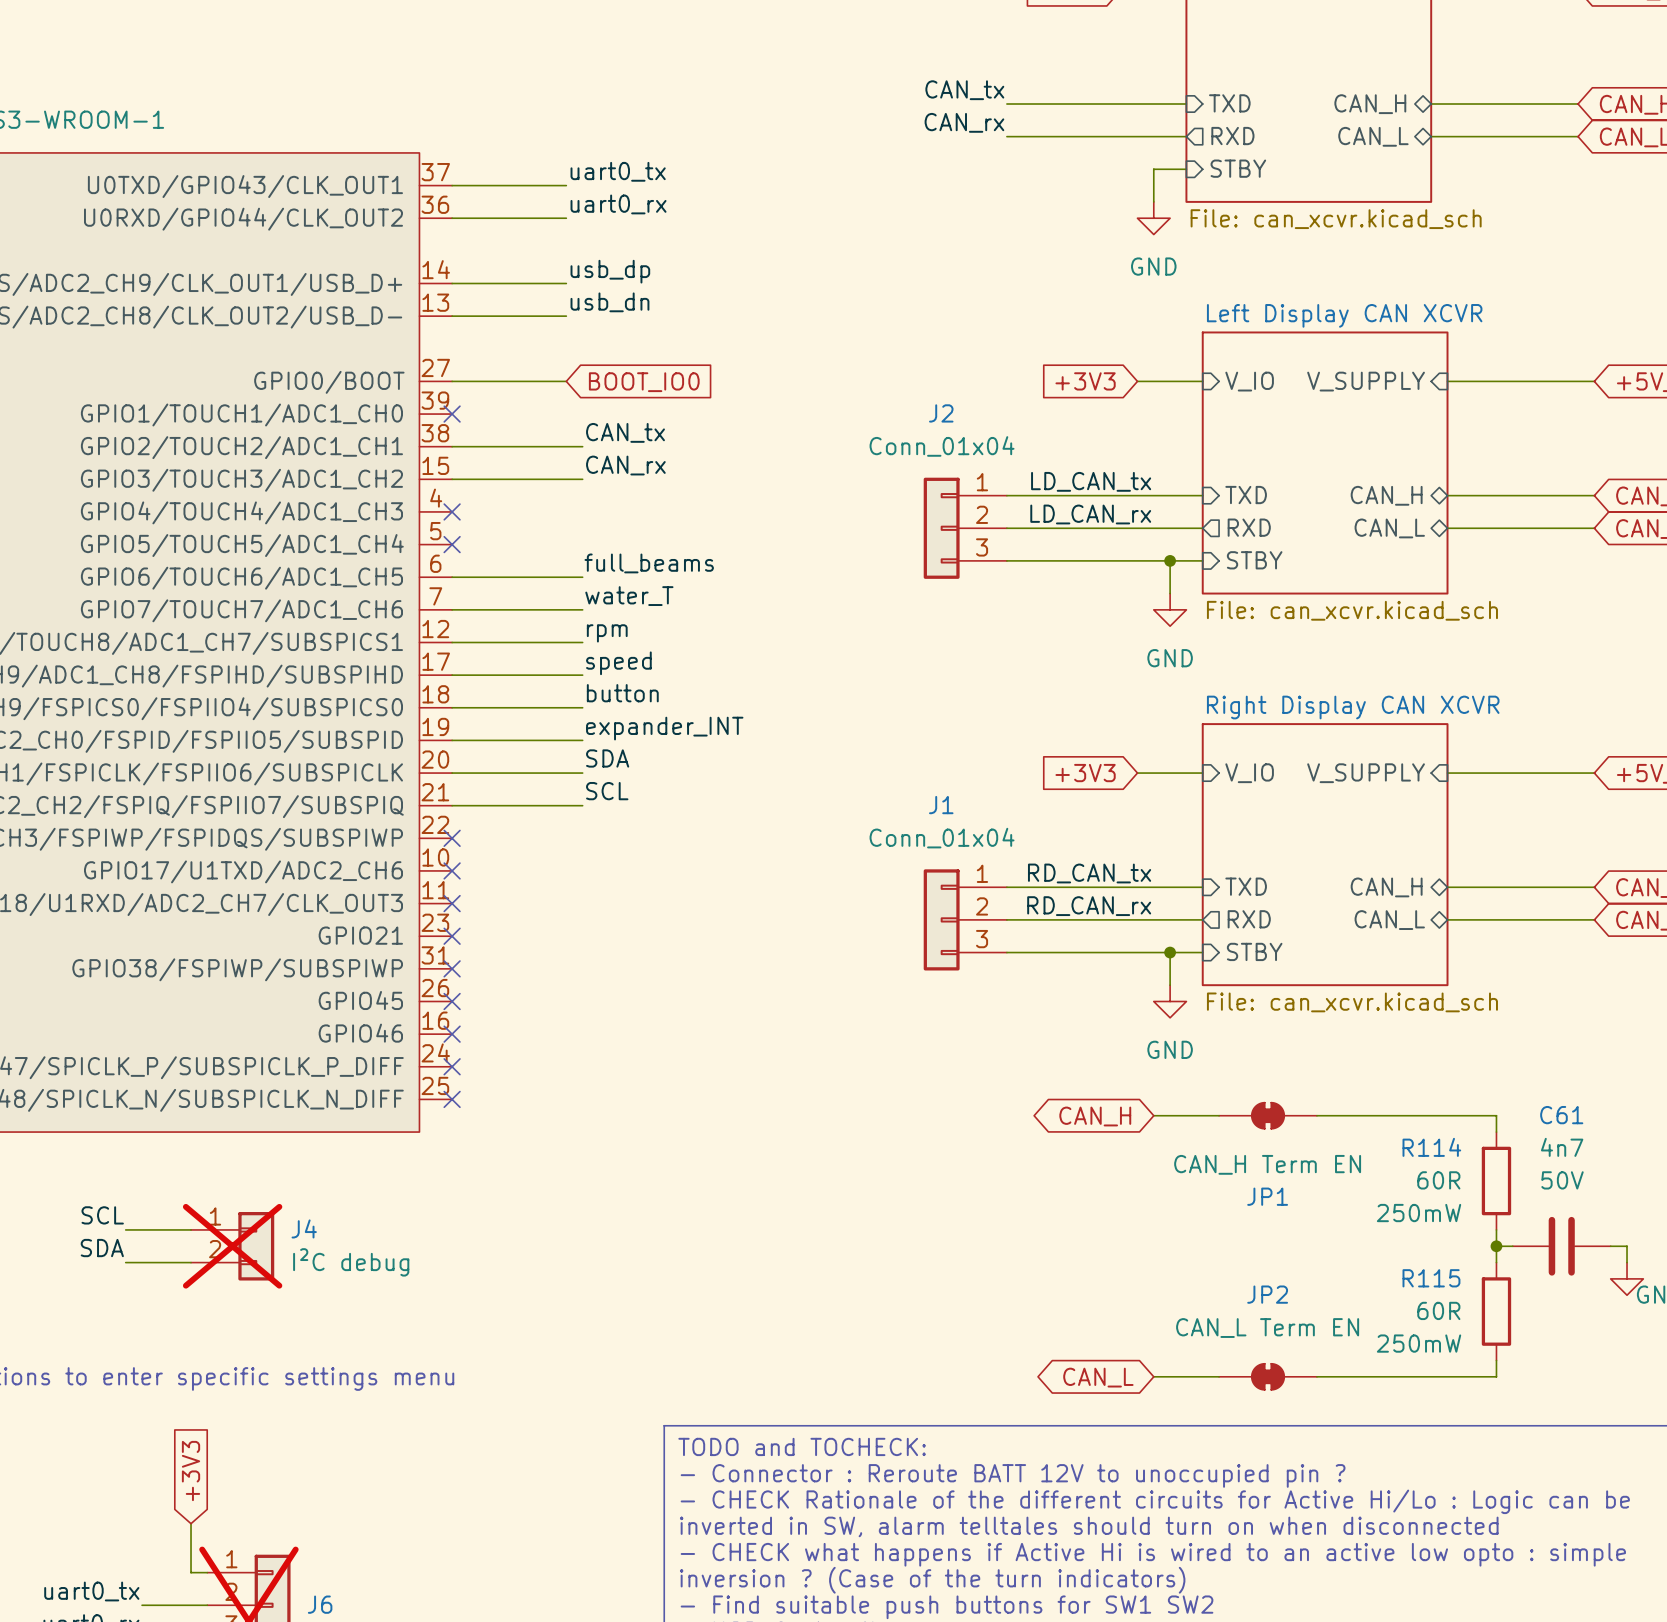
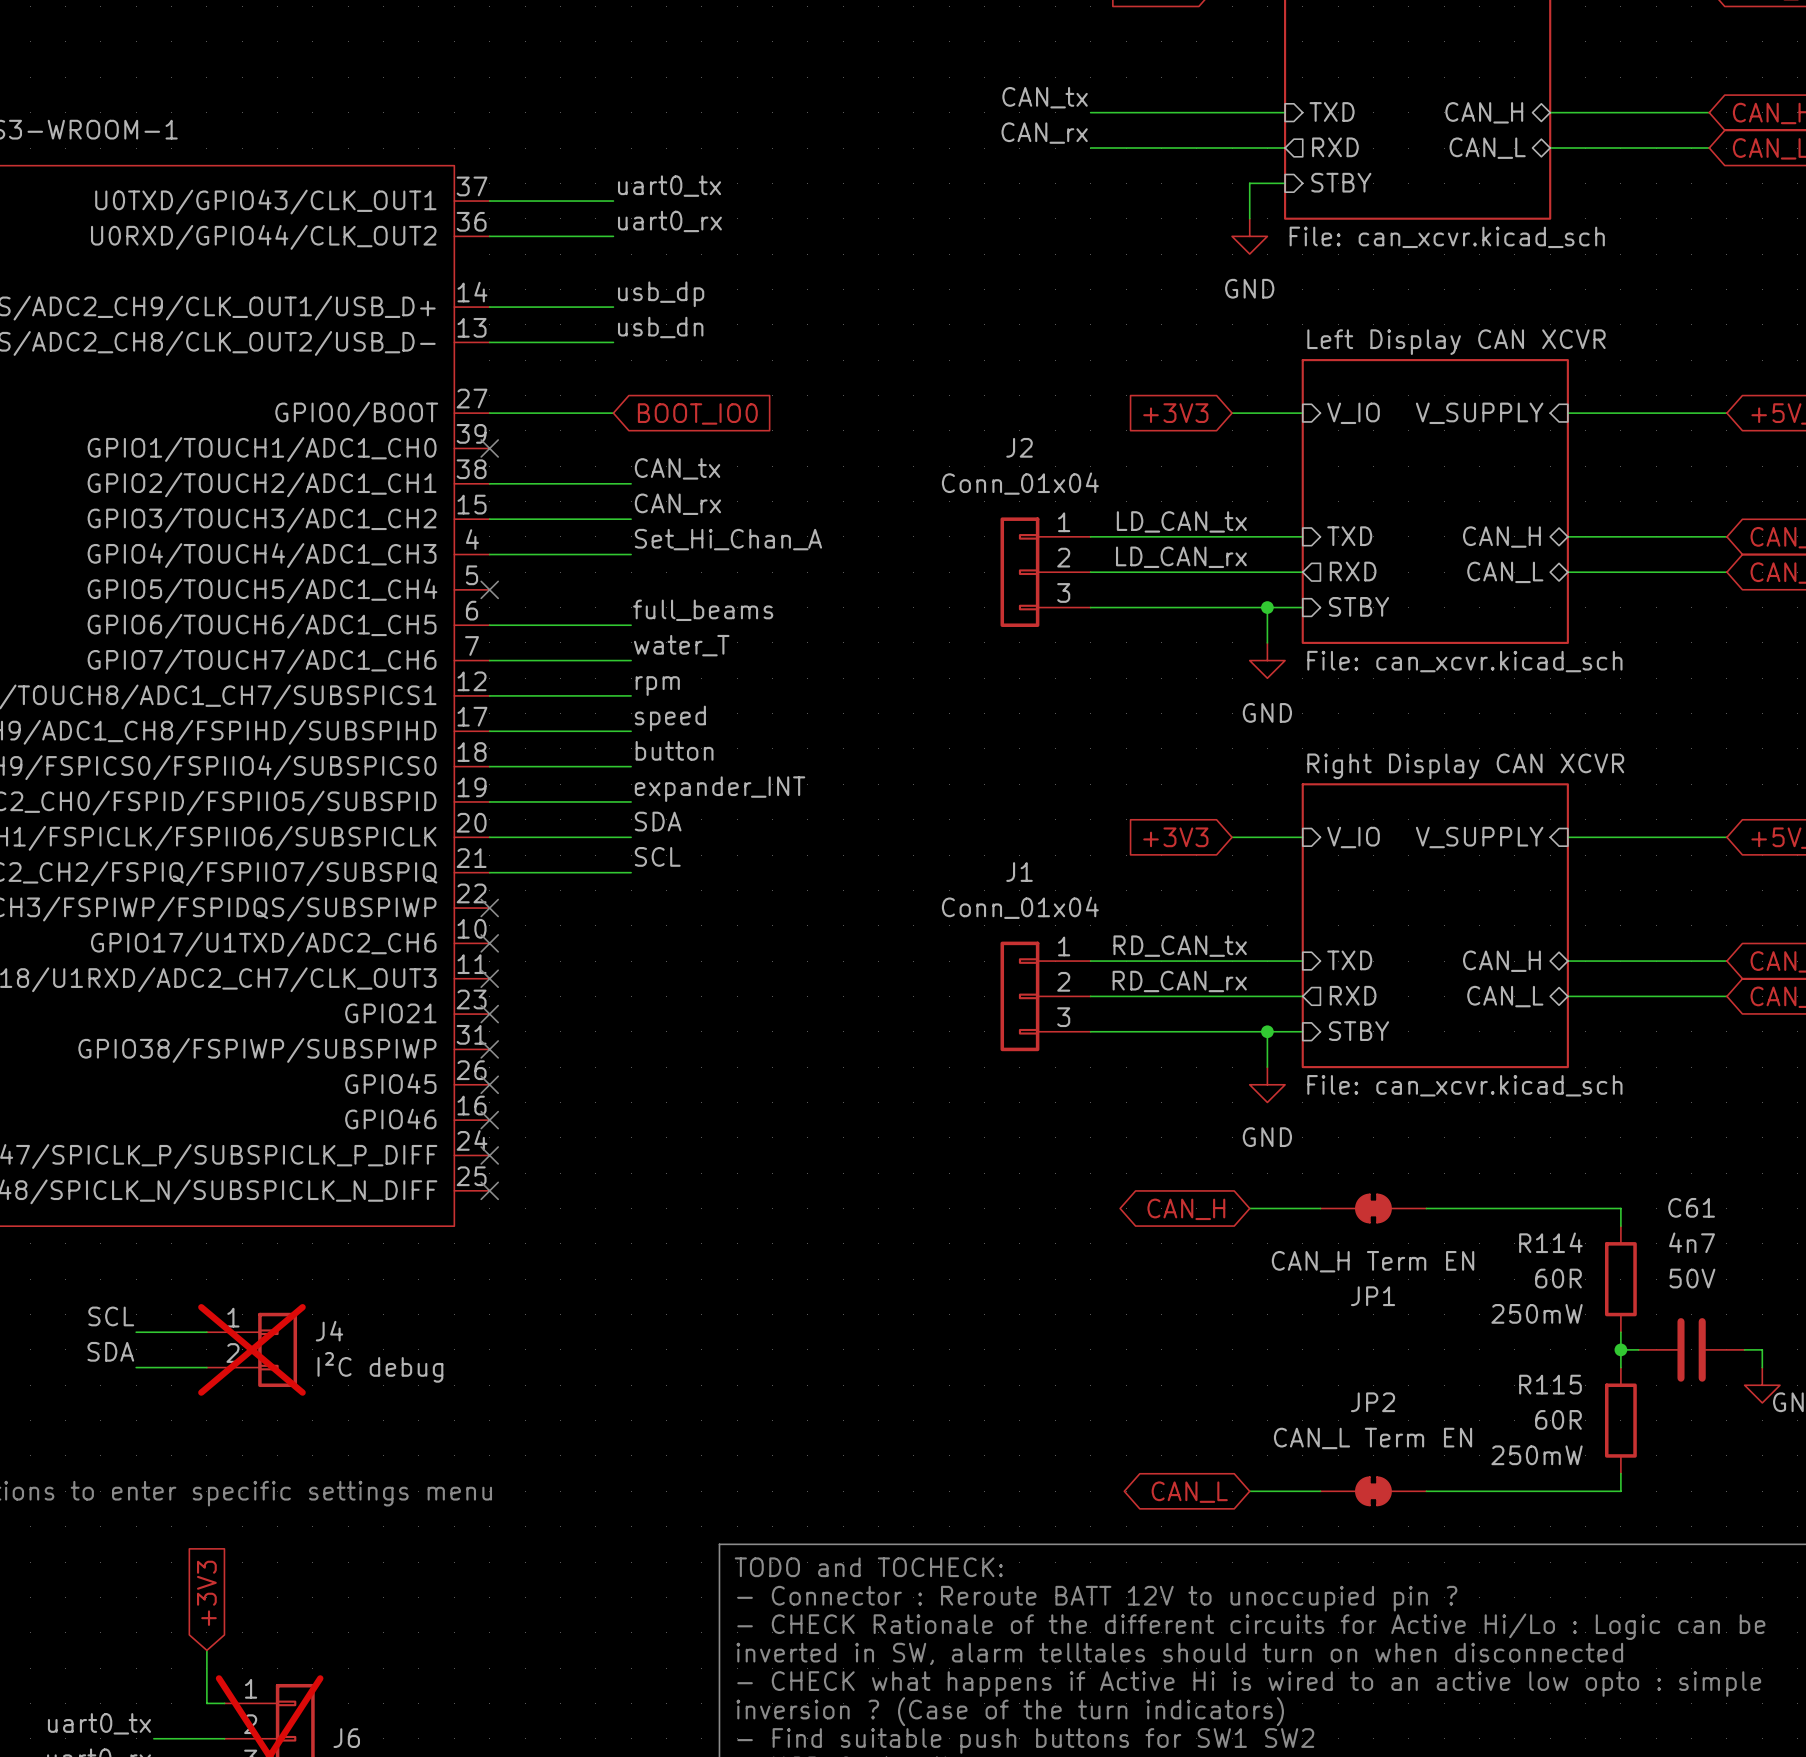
label: none -> Set_Hi_Chan_A (728, 539)
wire: none -> (489, 554) (631, 554)
no-connect mark: (452, 511) -> none

